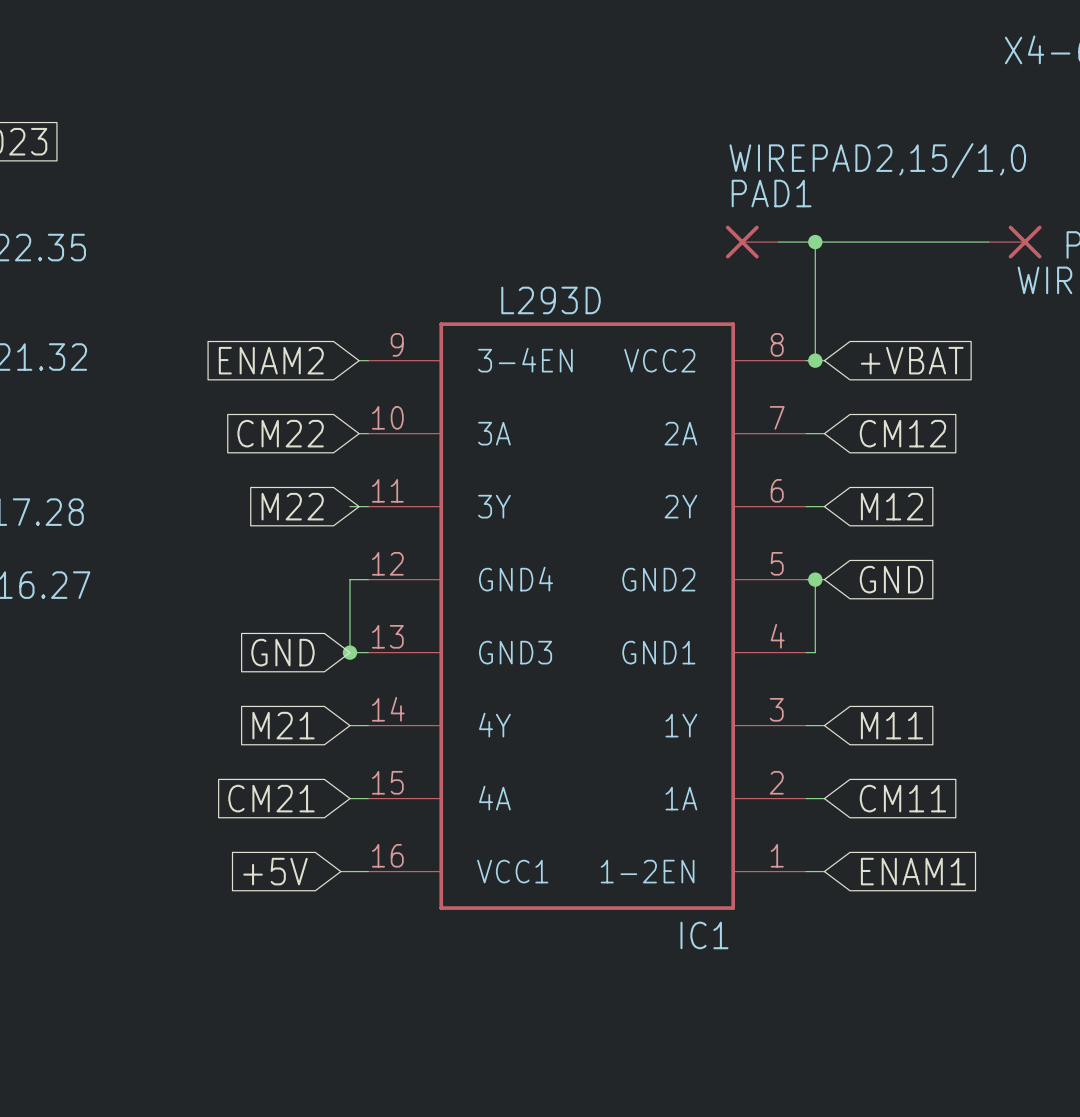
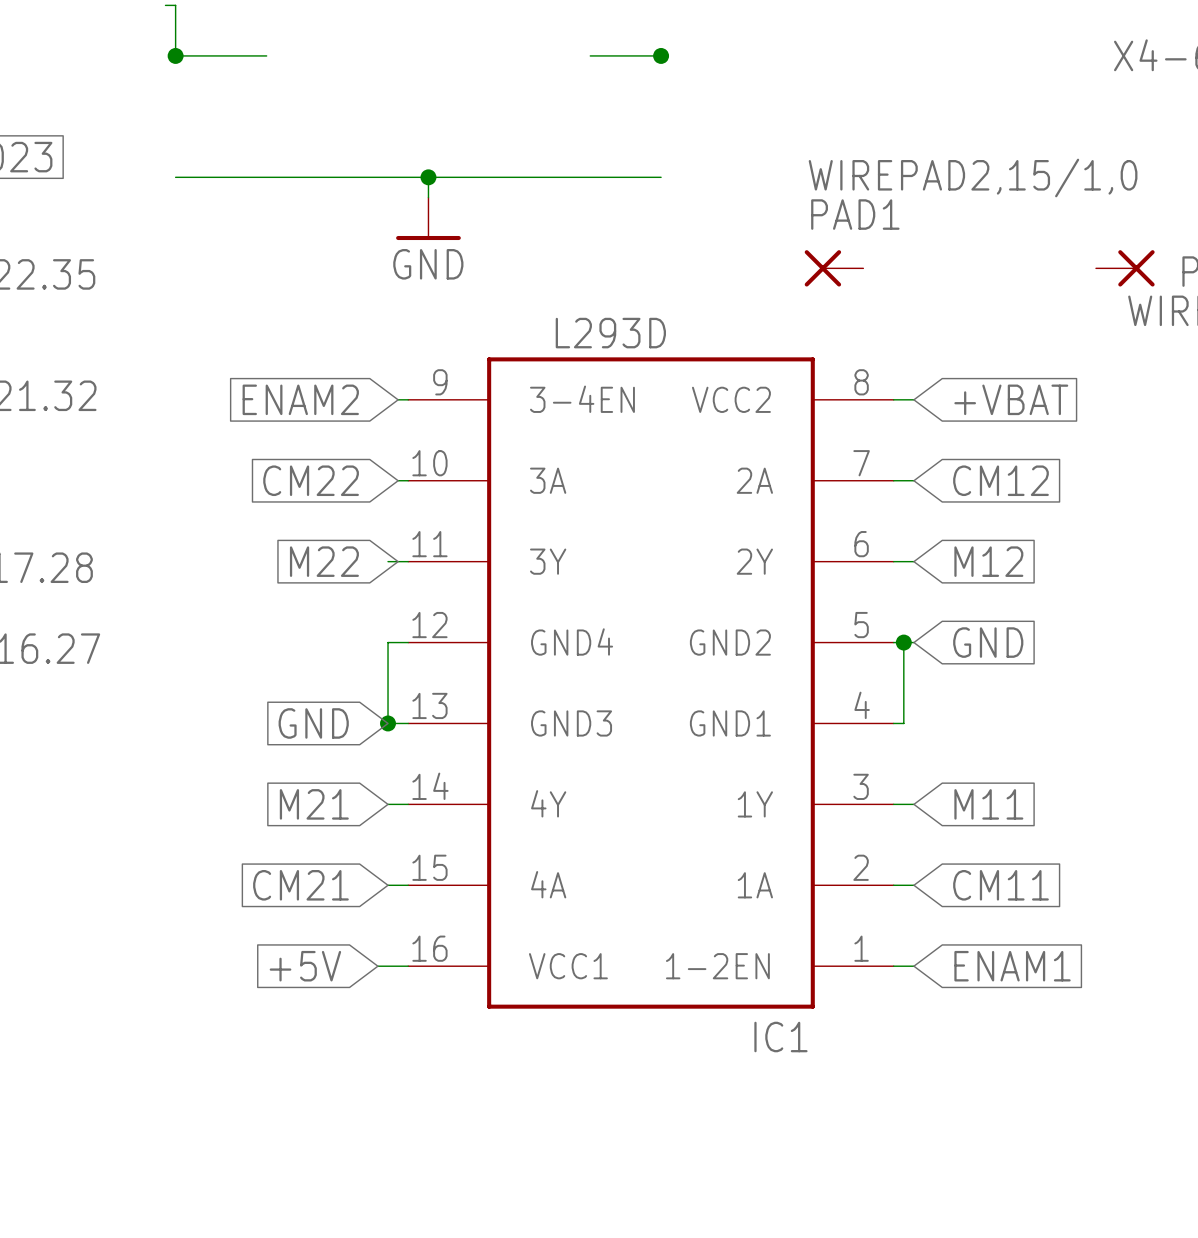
wire: none -> (165, 5) (175, 5) (175, 55) (266, 55)
junction: none -> (175, 55)
wire: none -> (590, 55) (661, 55)
junction: none -> (661, 55)
wire: none -> (175, 177) (661, 177)
wire: none -> (428, 177) (428, 197)
junction: none -> (428, 177)
power symbol: none -> GND (428, 218)
wire: (778, 242) (988, 242) -> none
wire: (815, 242) (815, 360) -> none
junction: (815, 242) -> none
junction: (815, 360) -> none

